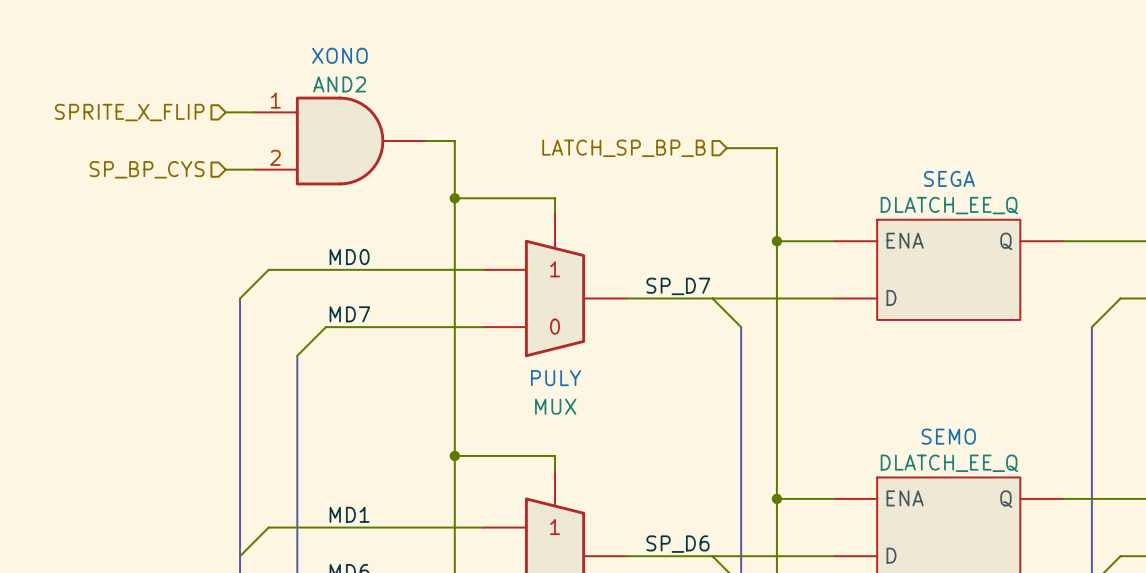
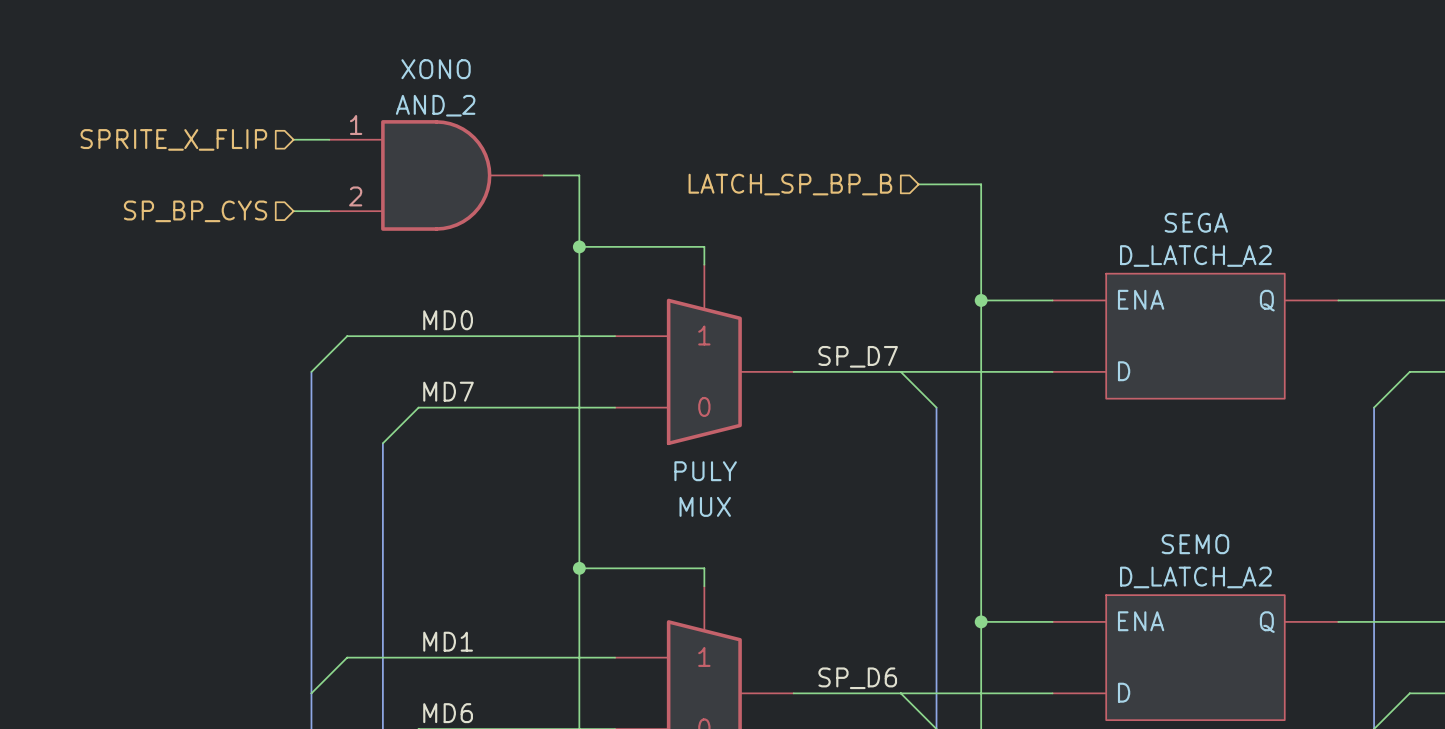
XONO value: AND2 (339, 84) -> AND_2 (435, 105)
SEGA value: DLATCH_EE_Q (949, 205) -> D_LATCH_A2 (1195, 256)
SEMO value: DLATCH_EE_Q (949, 463) -> D_LATCH_A2 (1195, 577)

